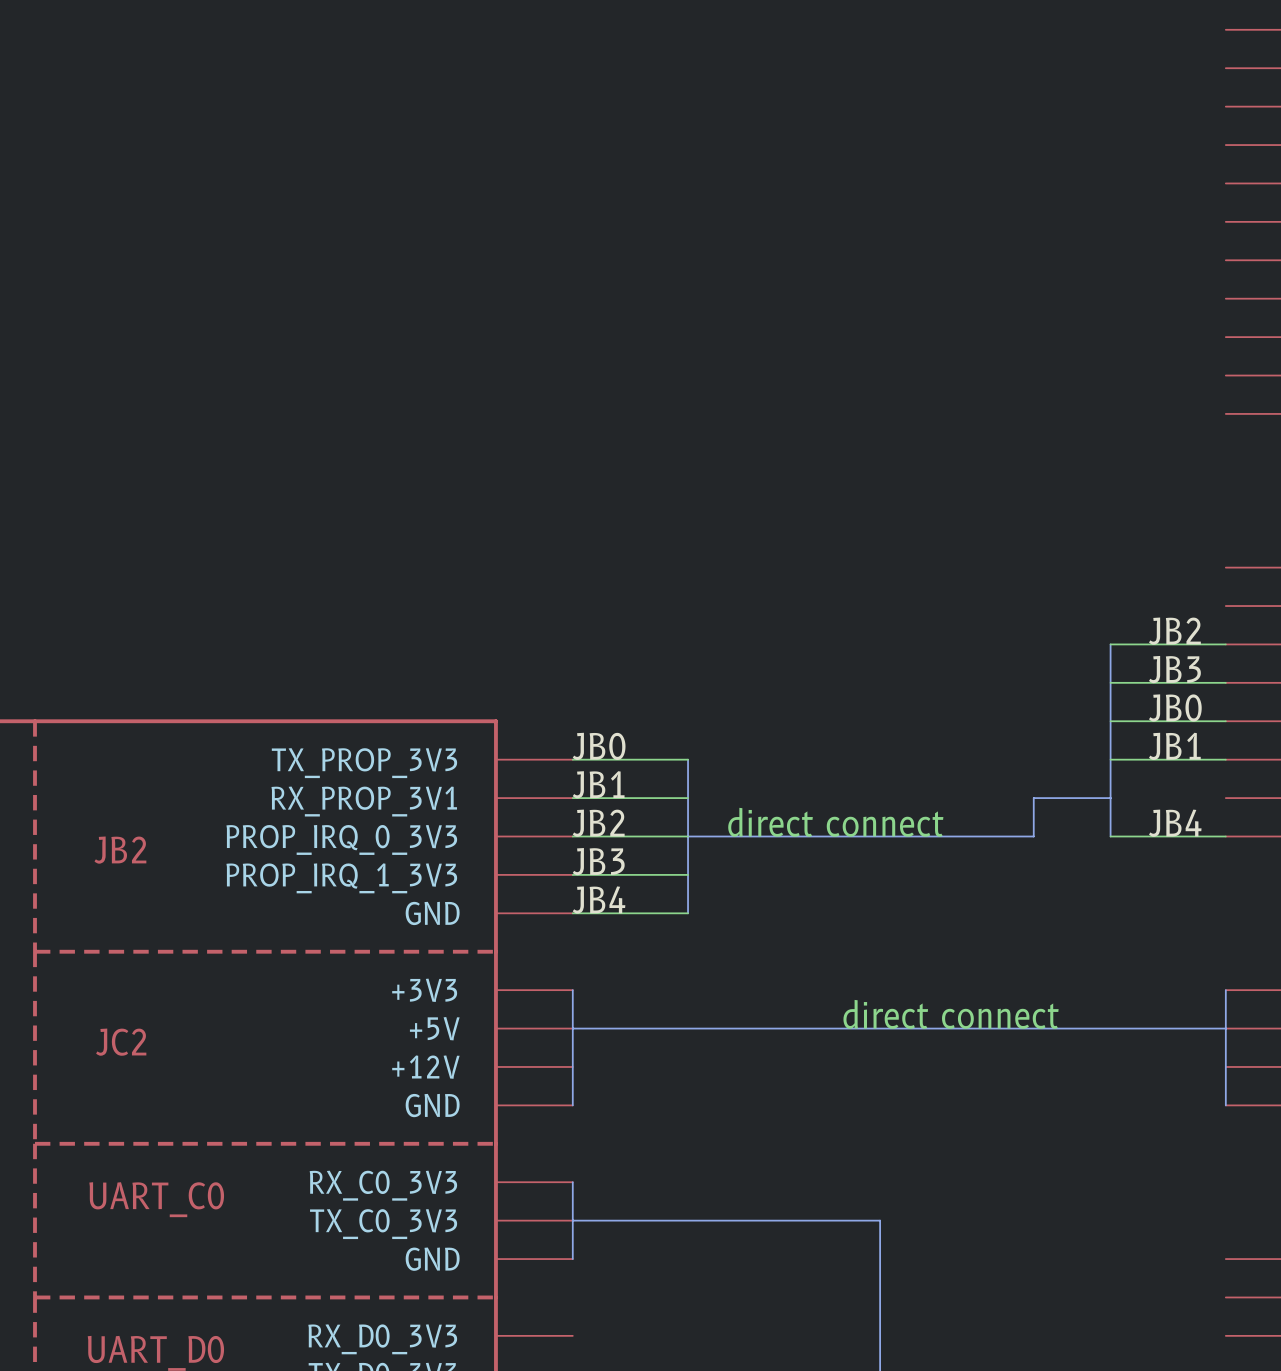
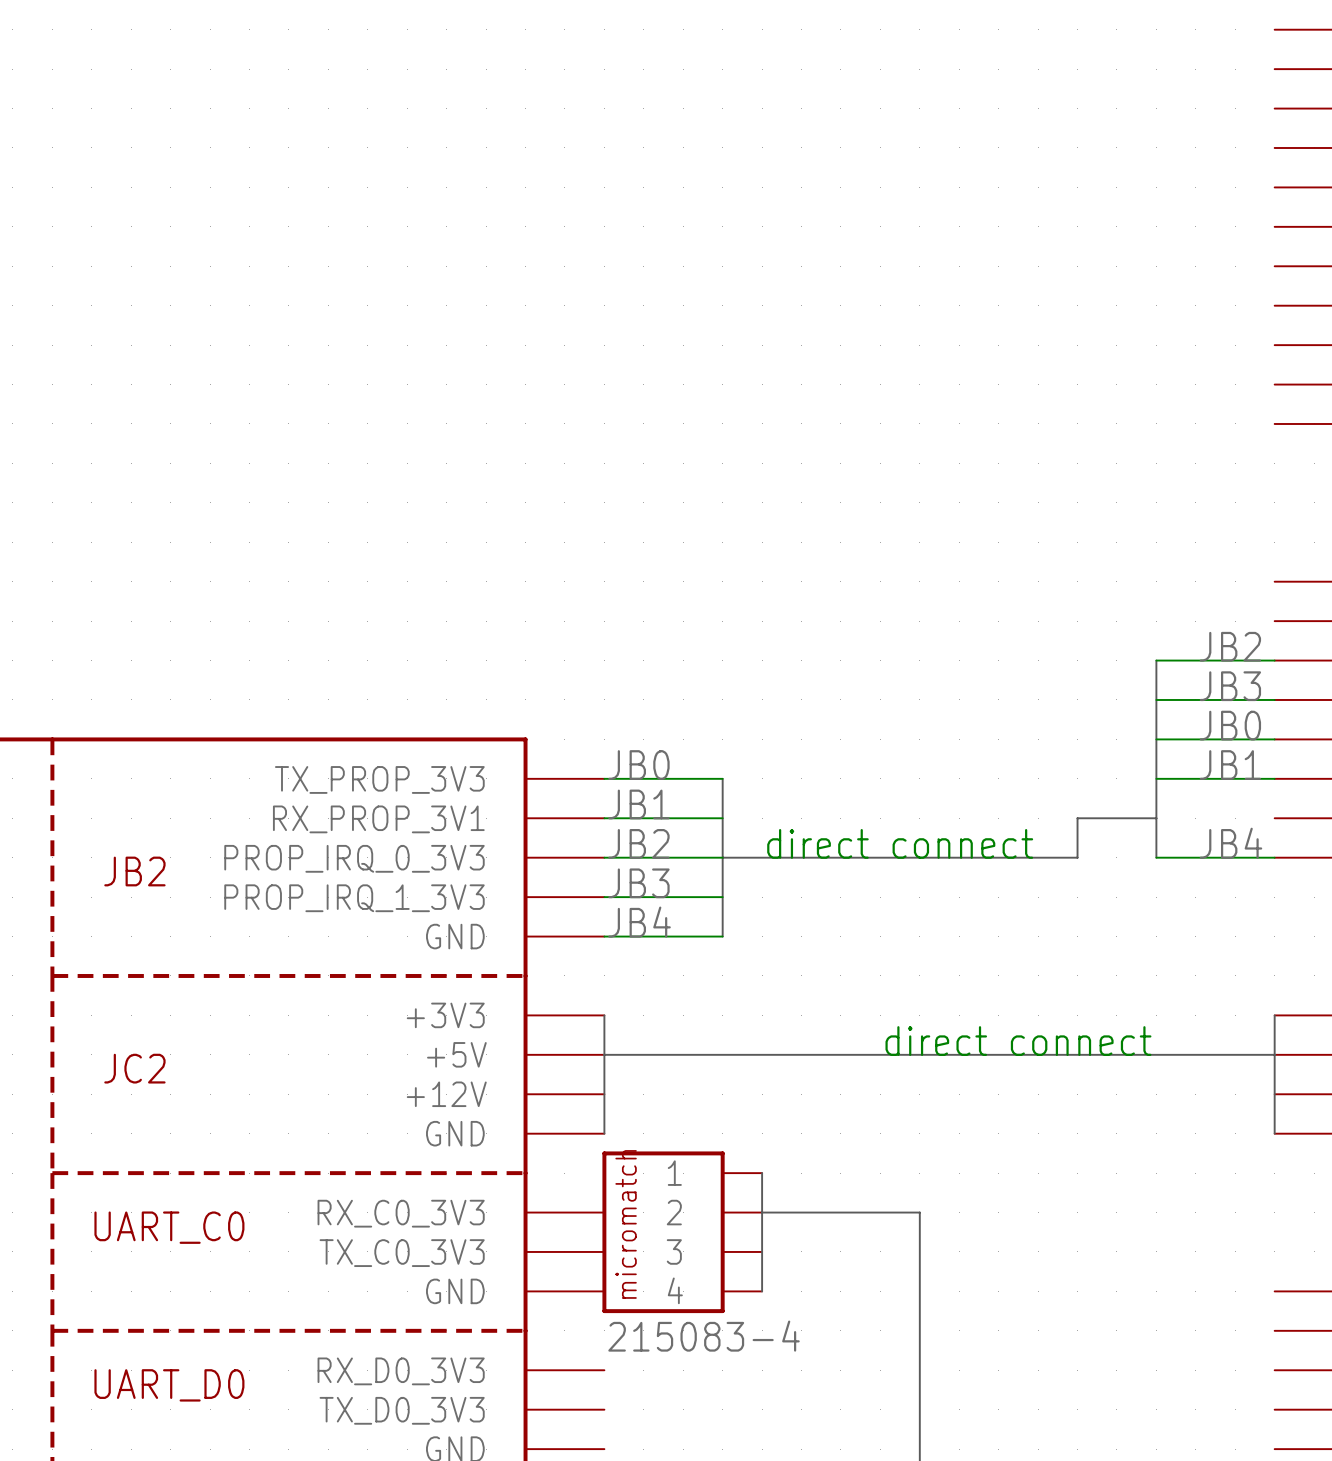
bus: none -> (762, 1173) (762, 1291)
bus: (572, 1182) (572, 1259) -> none
part: none -> 215083-4 (682, 1232)
bus: (572, 1220) (880, 1220) -> (762, 1212) (919, 1212) (919, 1251)

